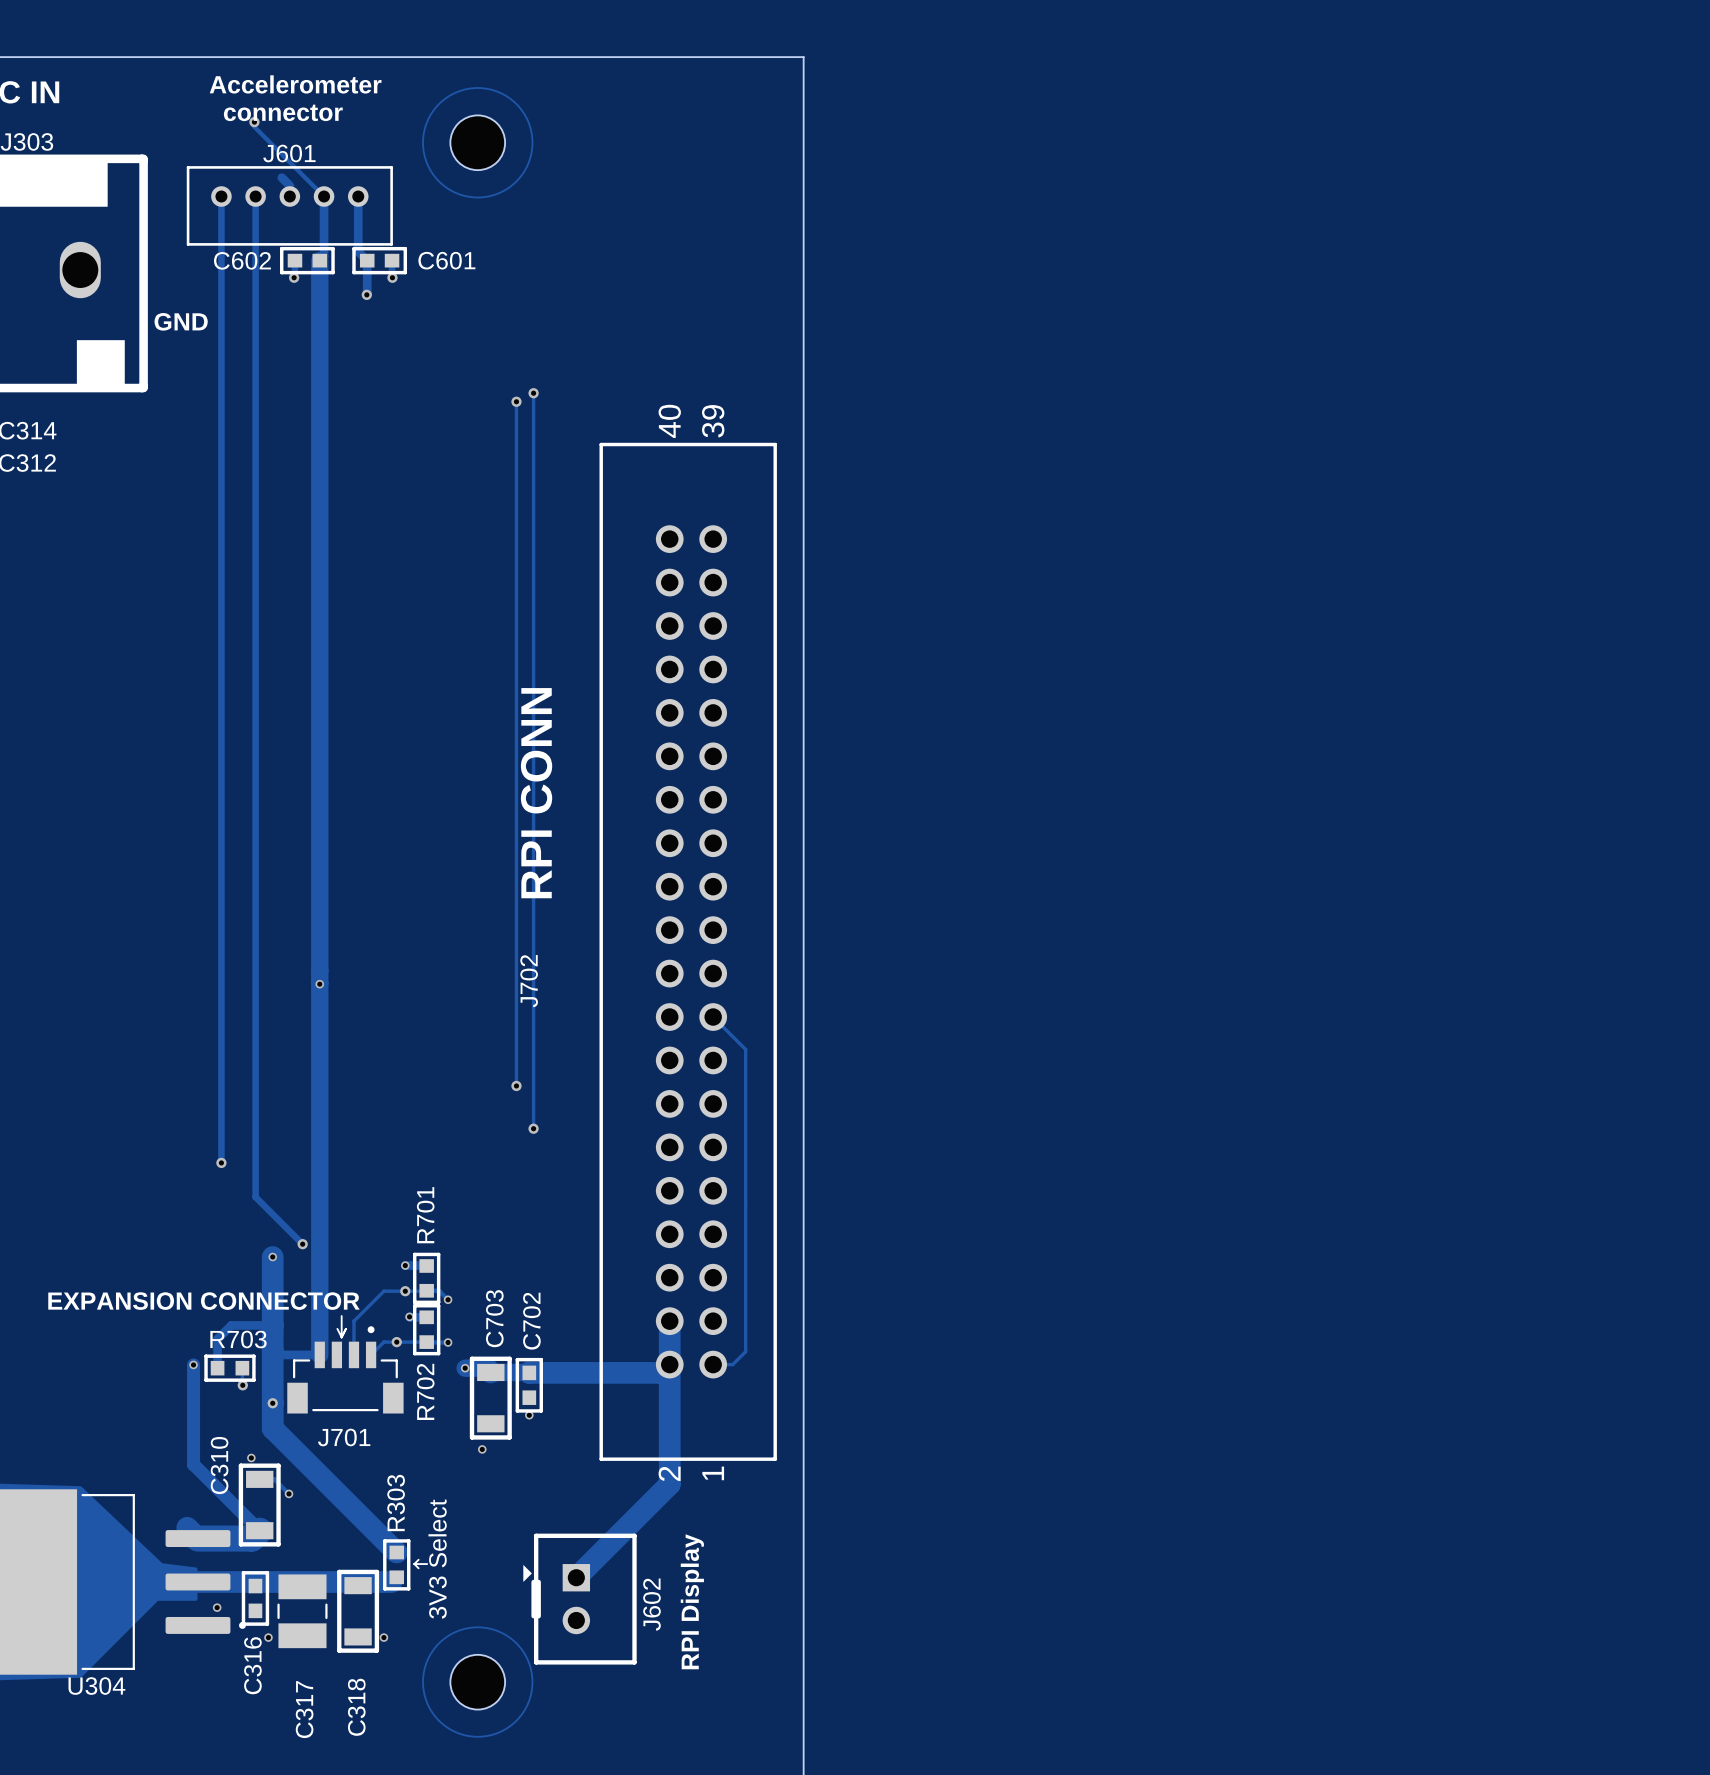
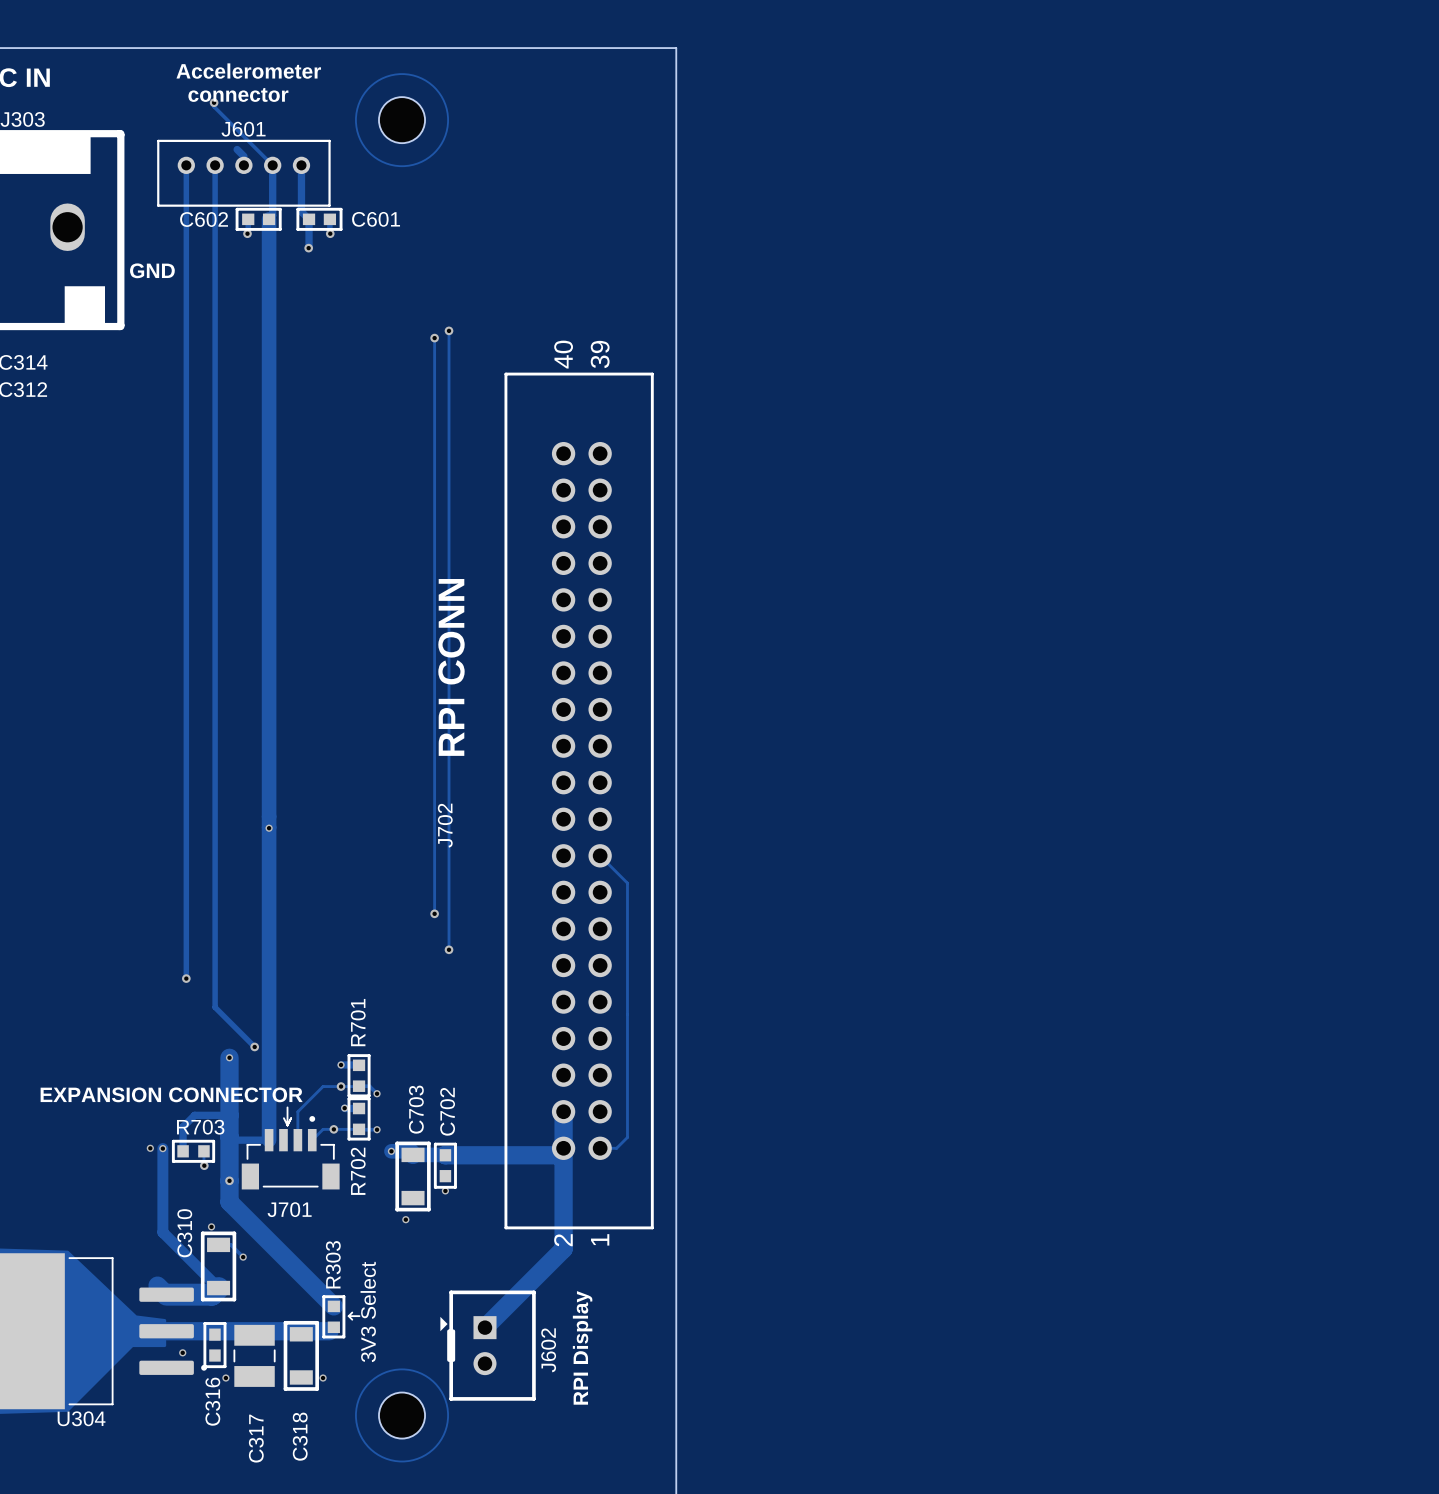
via: none -> (150, 1148)

